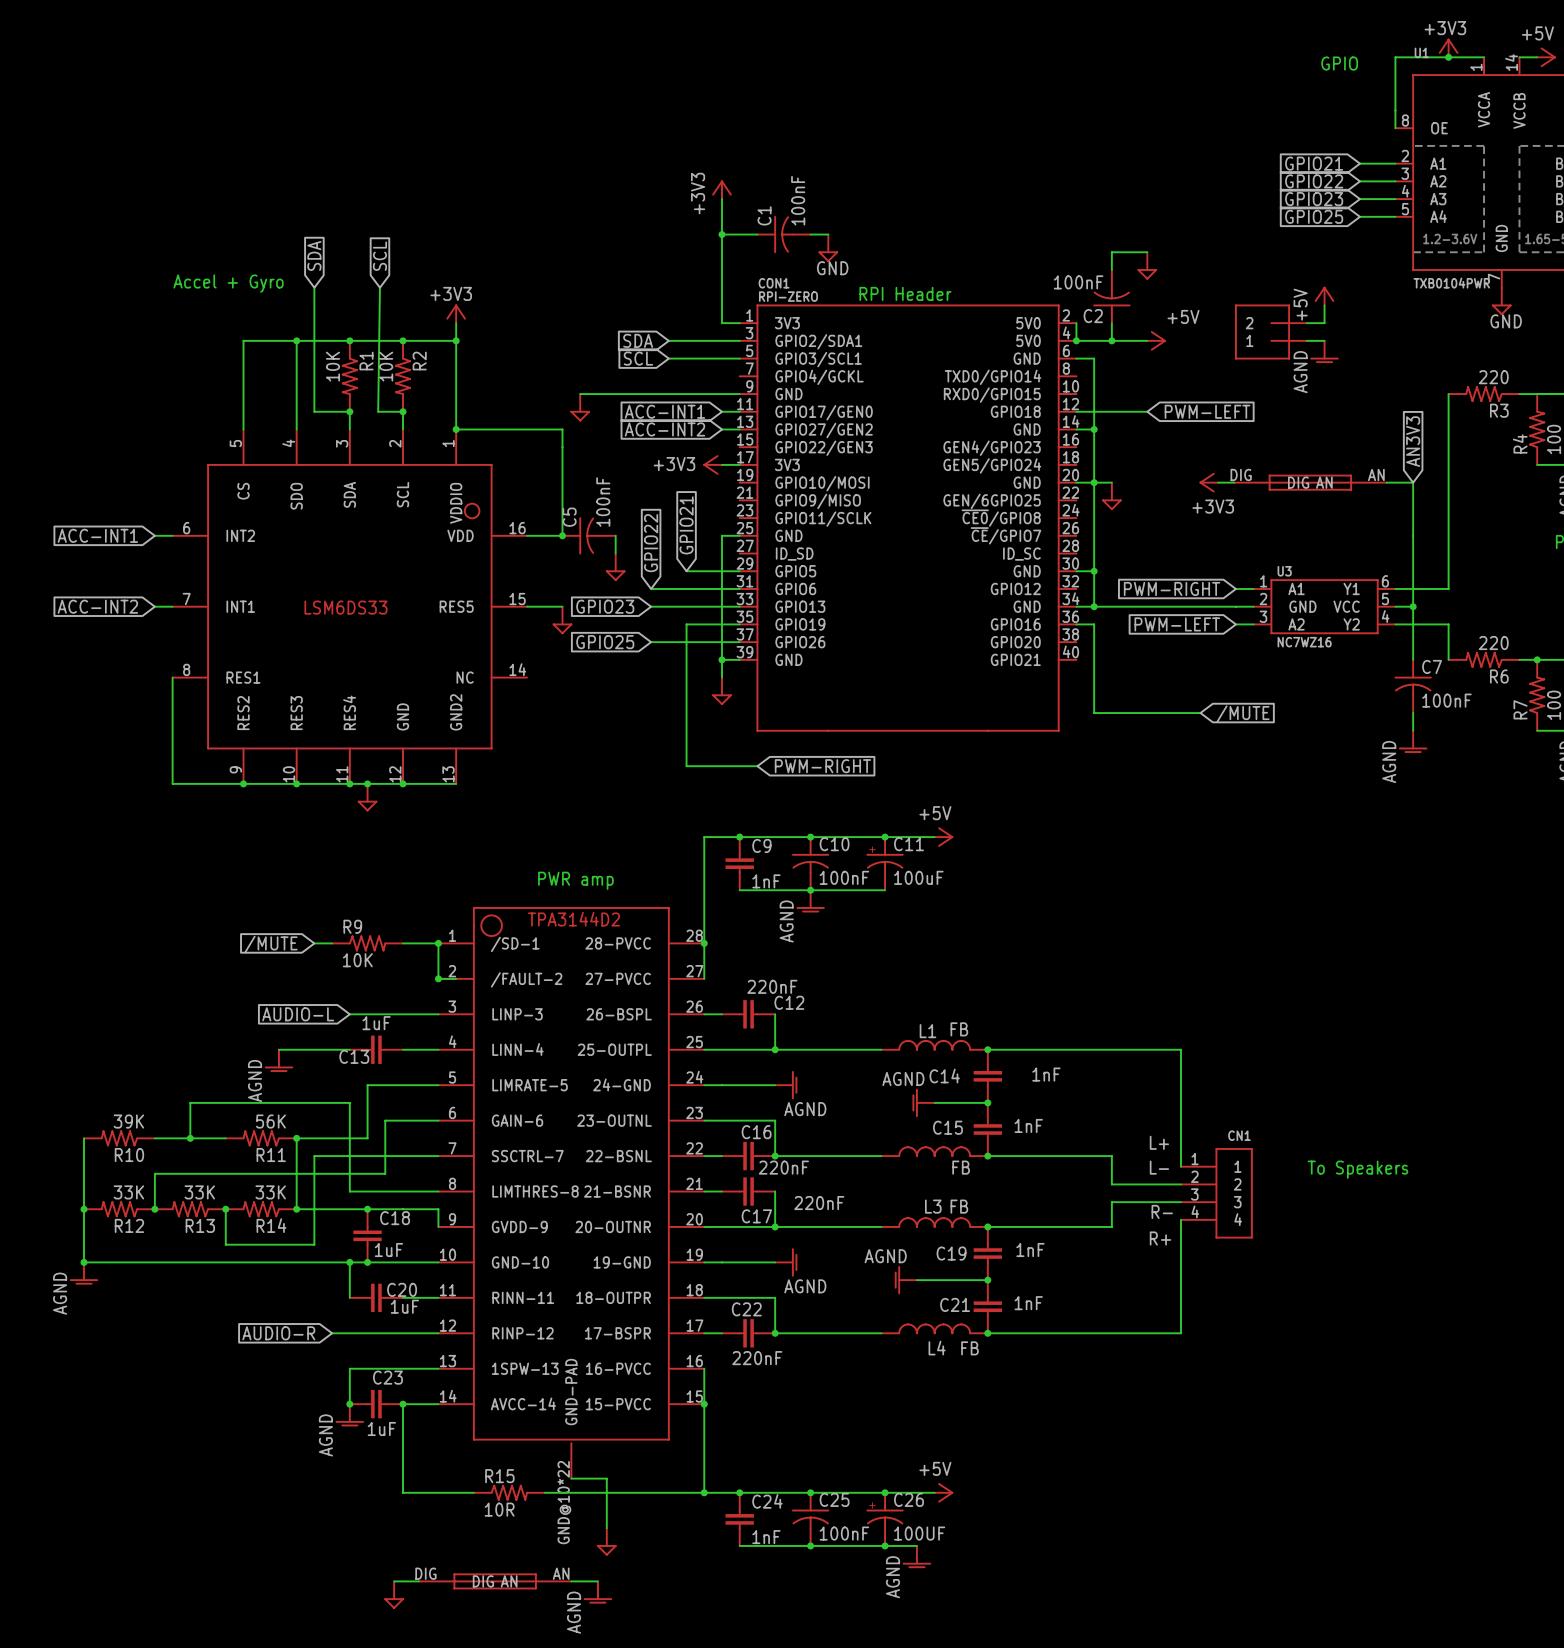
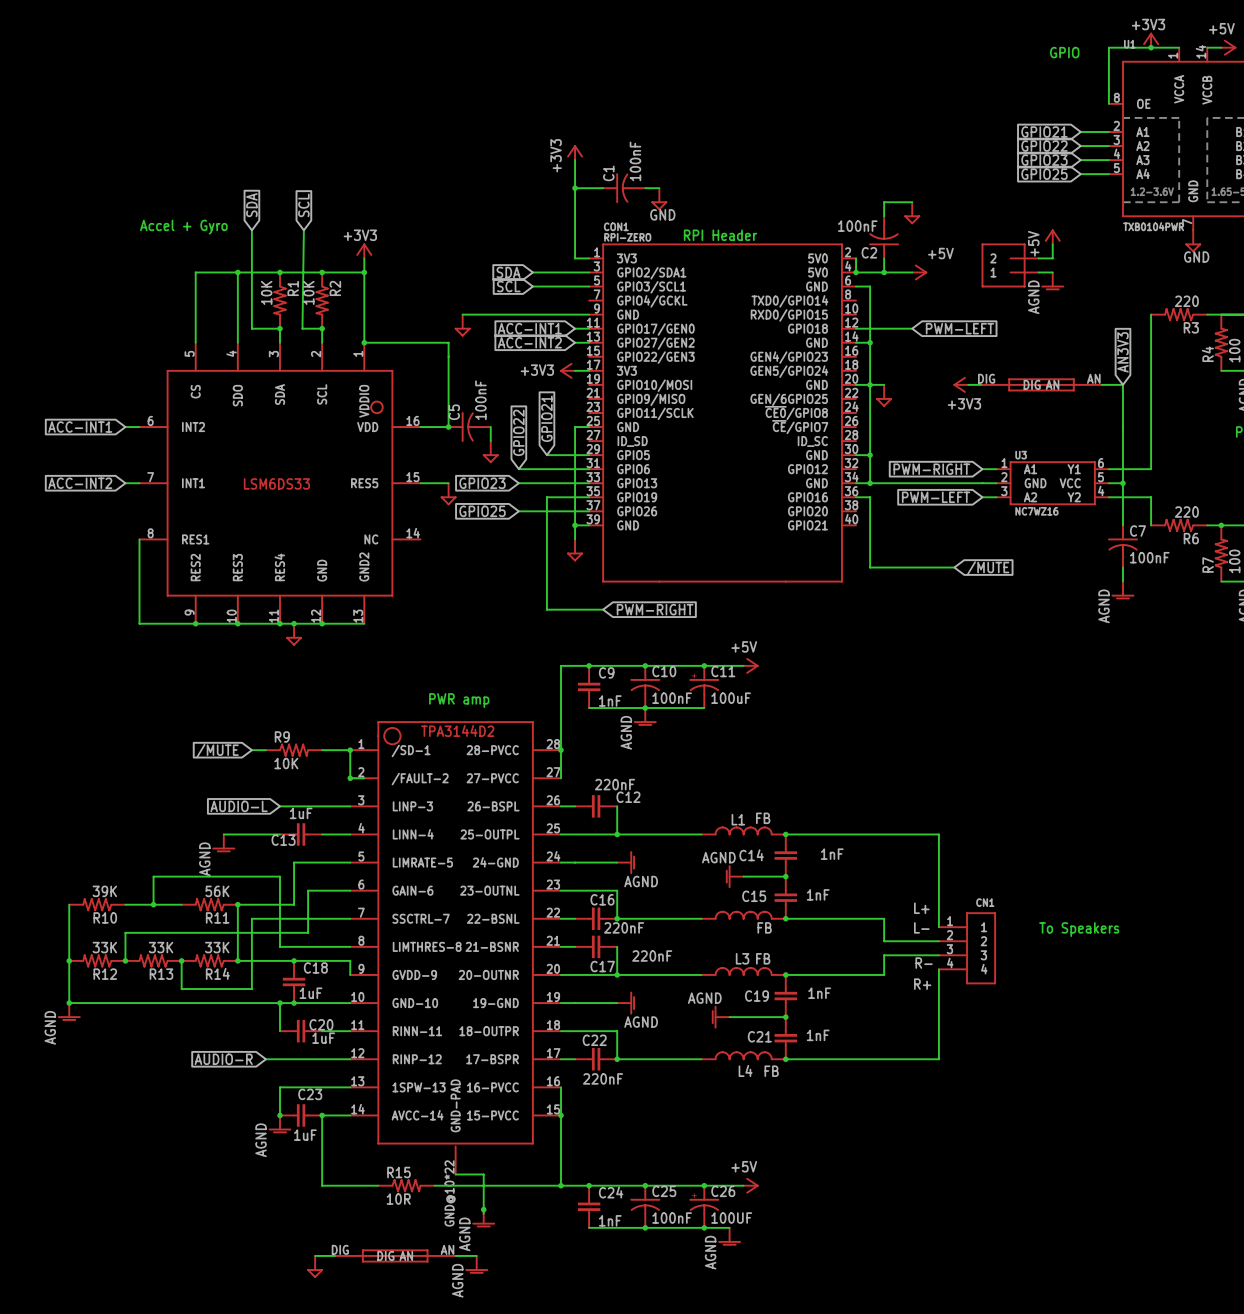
junction: none -> (483, 1209)
power symbol: none -> AGND (483, 1218)
power symbol: (606, 1541) -> none

